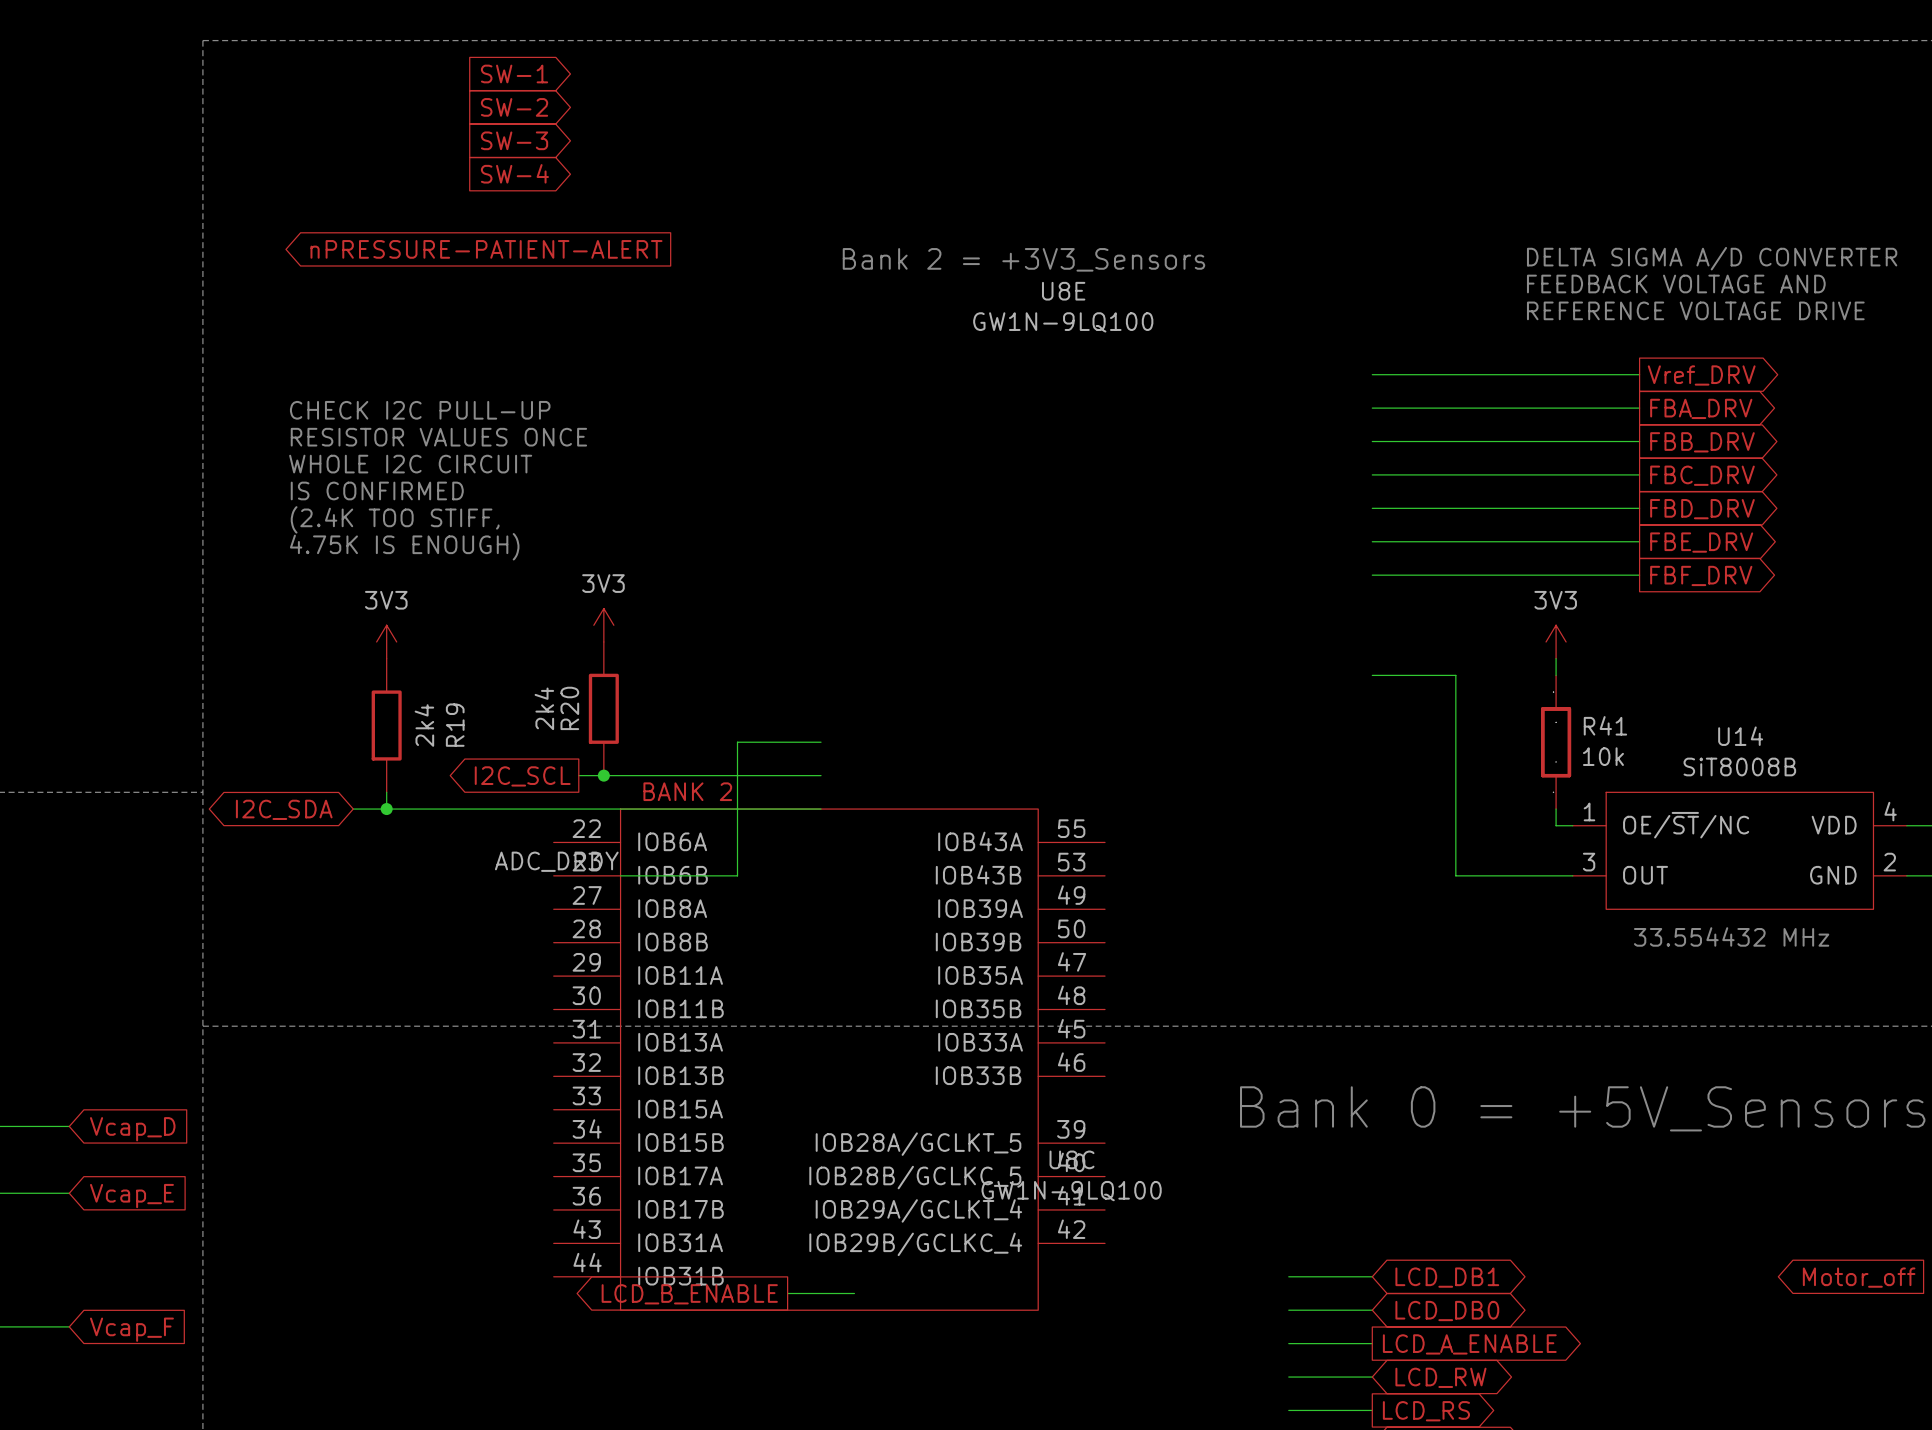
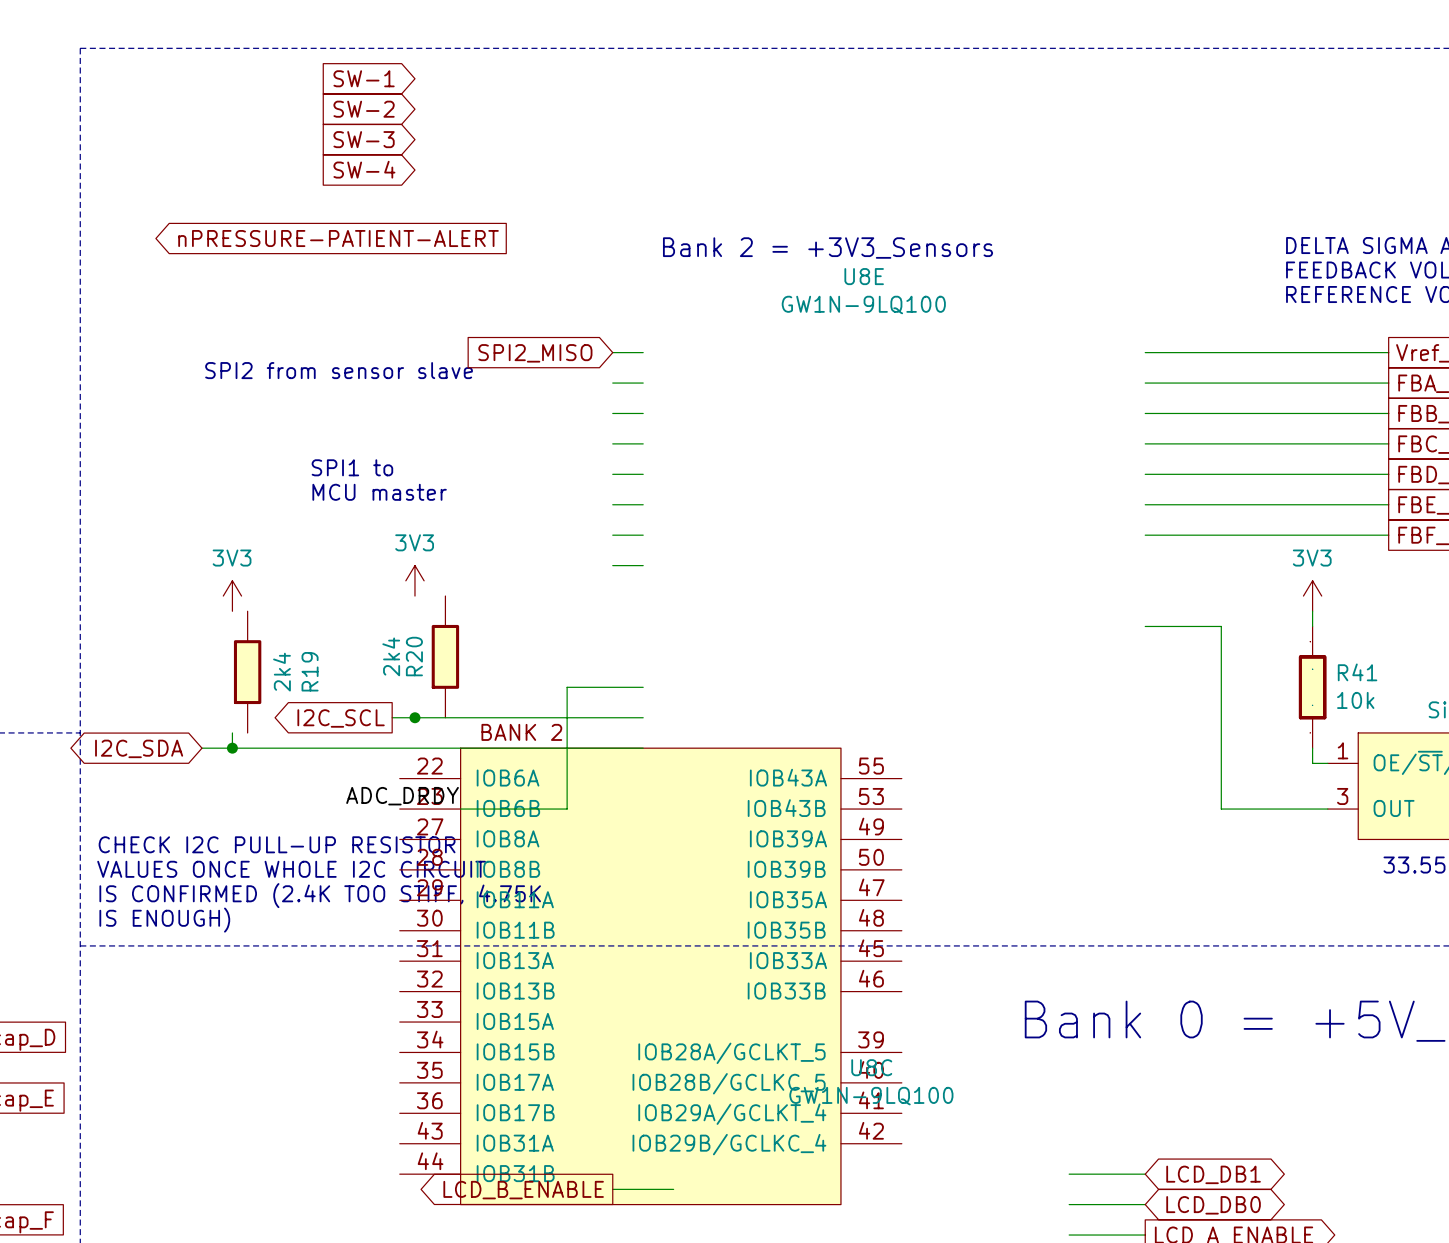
wire: none -> (612, 352) (643, 352)
global label: none -> SPI2_MISO (535, 353)
text: none -> SPI2 from sensor slave (339, 370)
wire: none -> (612, 383) (643, 383)
text: CHECK I2C PULL-UP (420, 410) -> none
text: RESISTOR VALUES ONCE (438, 437) -> none
wire: none -> (612, 413) (643, 413)
text: WHOLE I2C CIRCUIT (410, 464) -> none
wire: none -> (612, 443) (643, 443)
text: IS CONFIRMED (377, 490) -> none
text: none -> SPI1 to (352, 467)
wire: none -> (612, 474) (643, 474)
text: (2.4K TOO STIFF, (395, 519) -> none
text: none -> MCU master (379, 492)
wire: none -> (612, 504) (643, 504)
text: 4.75K IS ENOUGH) (404, 546) -> none
wire: none -> (612, 535) (643, 535)
wire: none -> (612, 565) (643, 565)
power symbol position: 3V3 (603, 625) -> 3V3 (414, 580)
power symbol position: 3V3 (386, 641) -> 3V3 (232, 596)
wire: none -> (392, 717) (422, 717)
junction position: (603, 775) -> (414, 717)
global label position: I2C_SCL (522, 776) -> I2C_SCL (341, 718)
wire: (386, 792) (386, 809) -> (232, 732) (232, 748)
global label position: I2C_SDA (284, 809) -> I2C_SDA (139, 748)
wire: none -> (201, 748) (217, 748)
junction position: (386, 809) -> (232, 748)
text: none -> CHECK I2C PULL-UP RESISTOR (277, 844)
text: none -> VALUES ONCE WHOLE I2C CIRCUIT (291, 869)
text: none -> IS CONFIRMED (2.4K TOO STIFF, 4.75K (320, 895)
text: none -> IS ENOUGH) (164, 920)

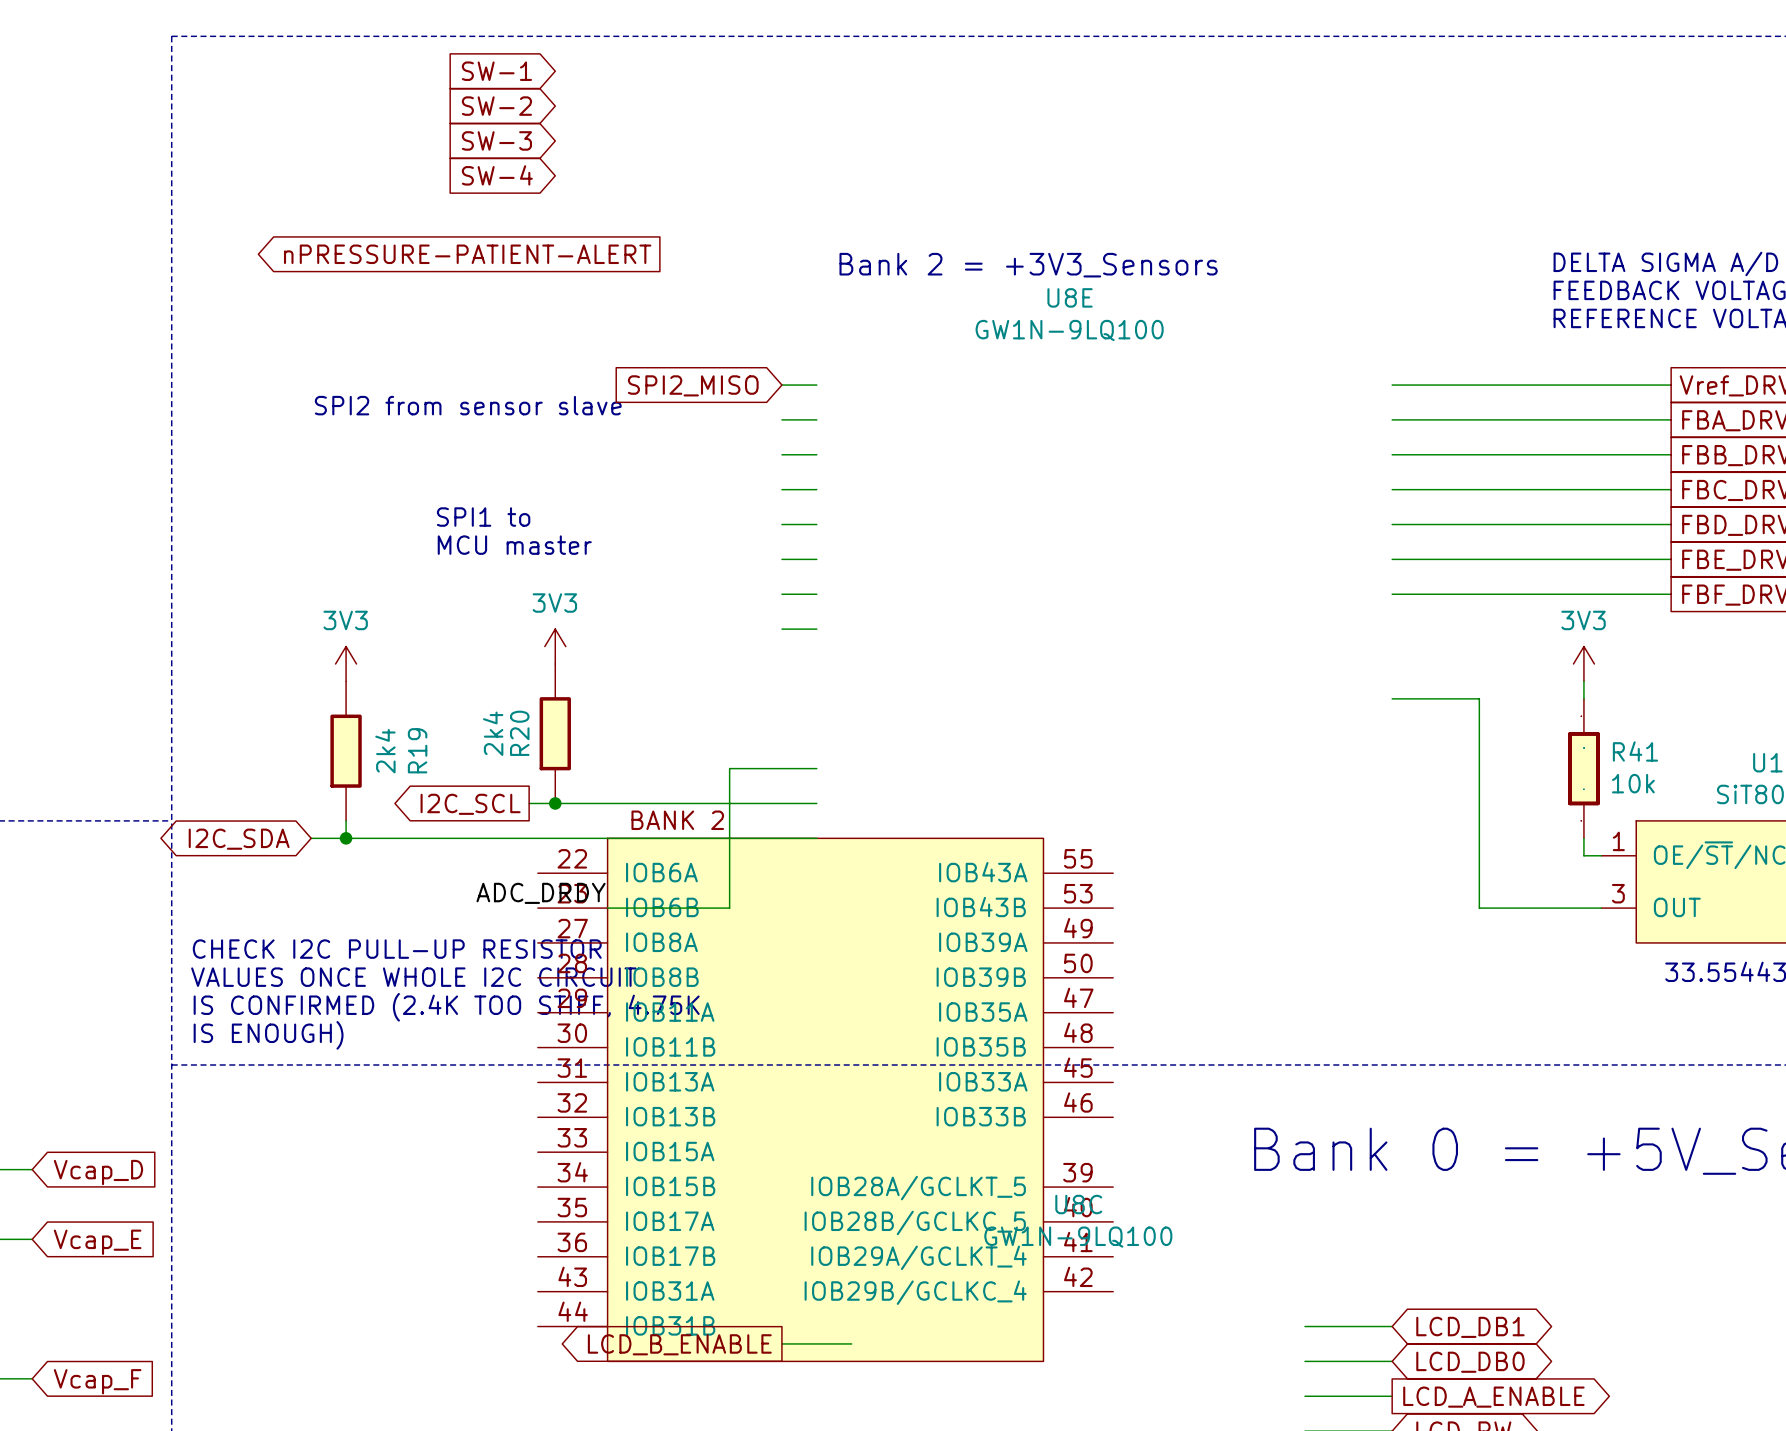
R20 position: (445, 656) -> (555, 733)
R19 position: (247, 672) -> (346, 751)

